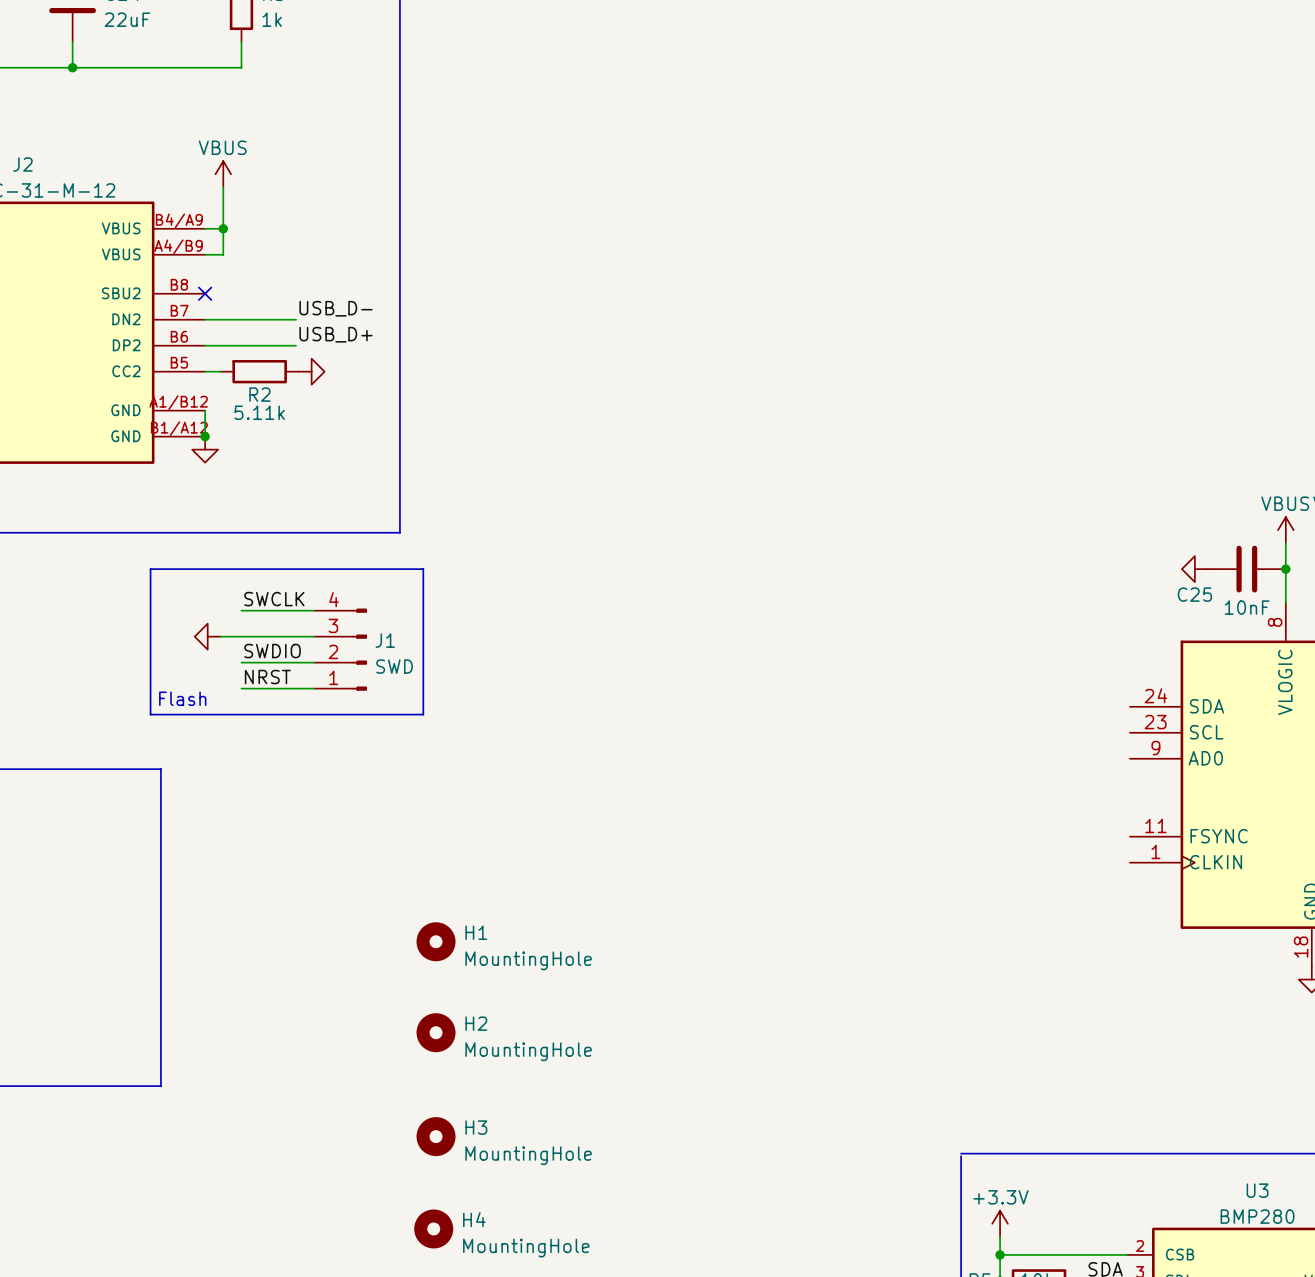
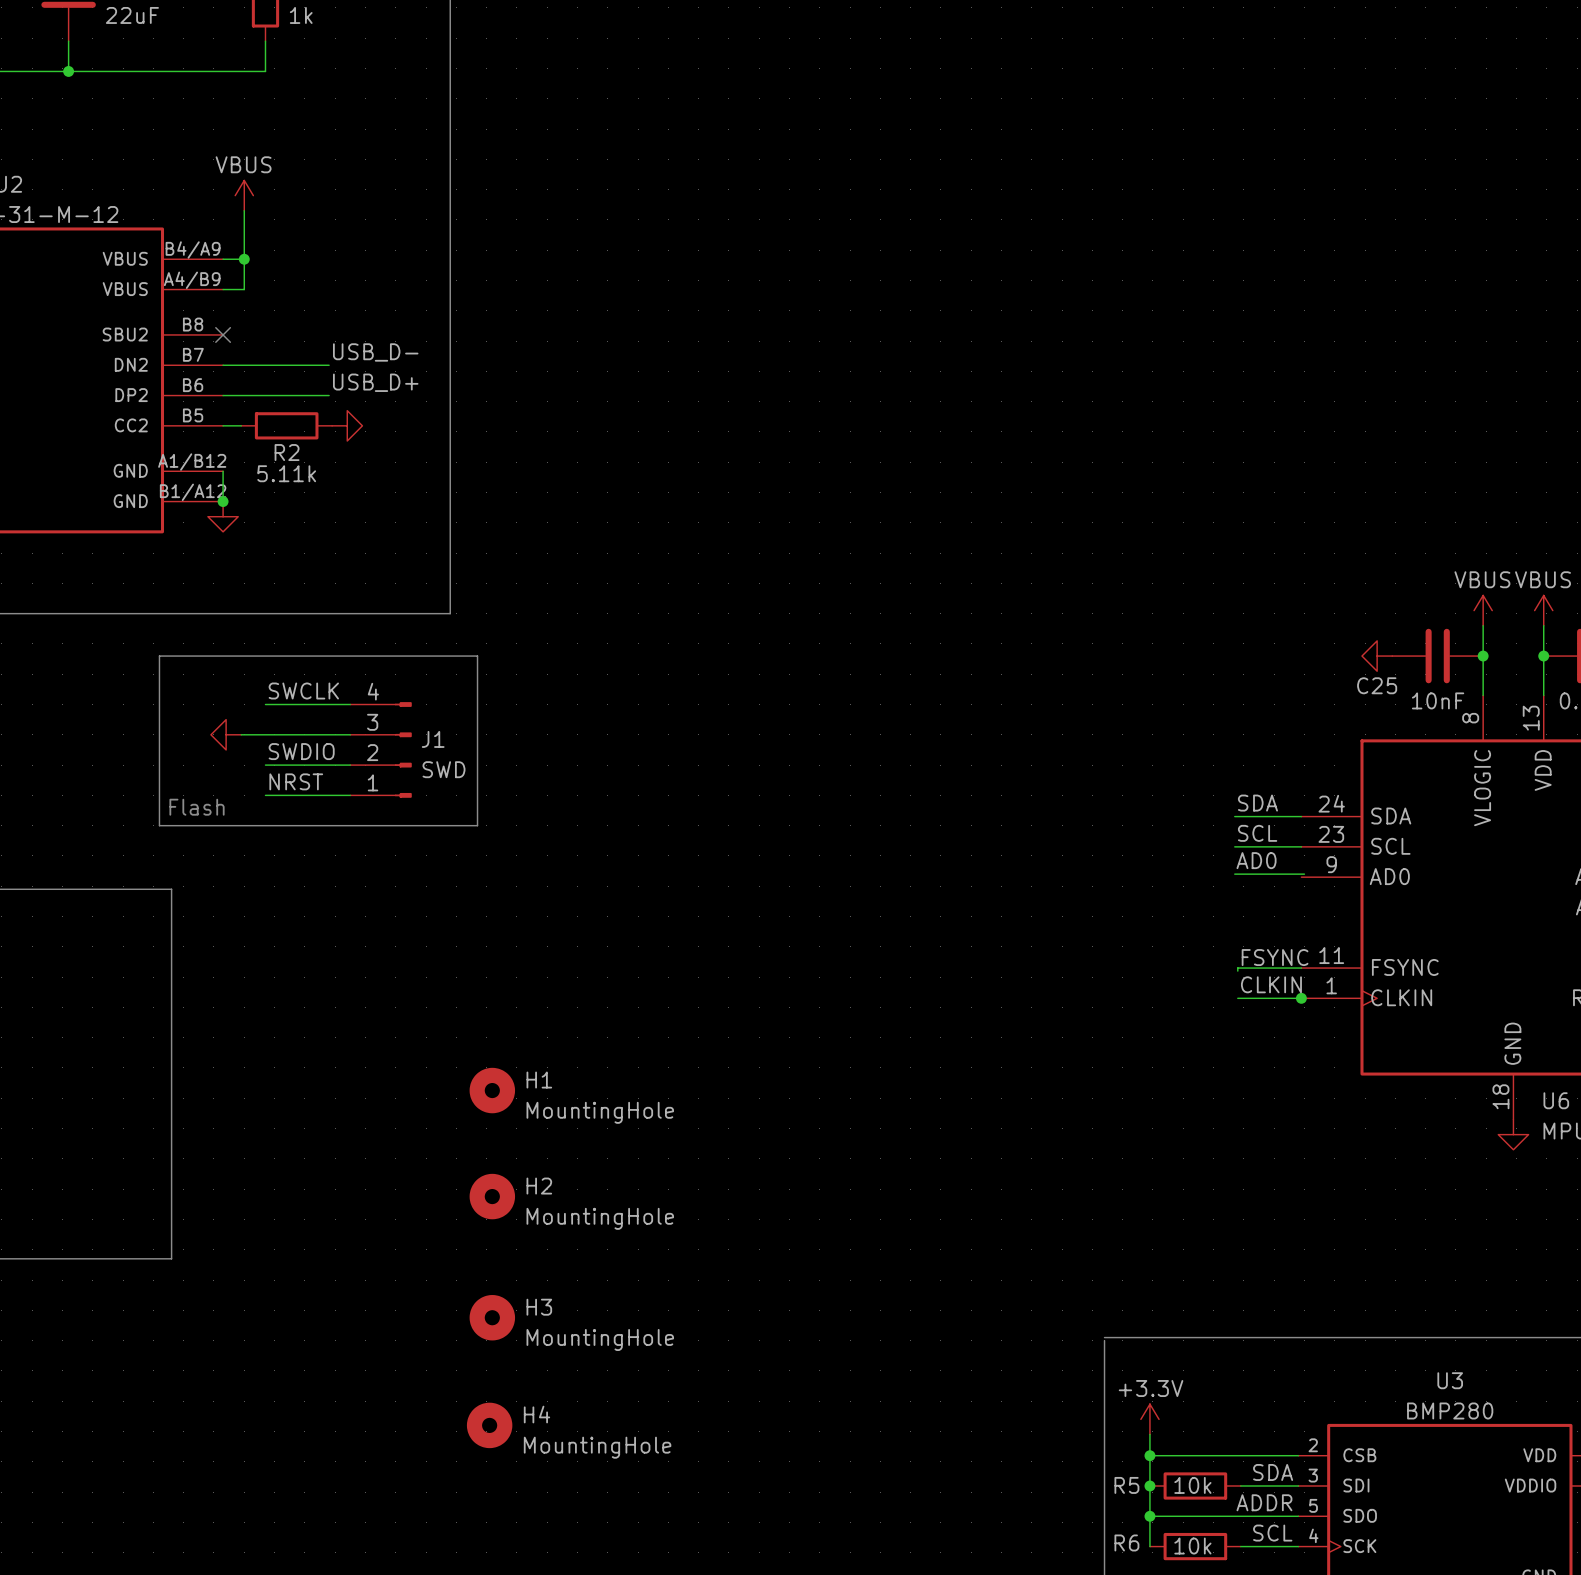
label: none -> SDA (1257, 803)
wire: none -> (1234, 816) (1301, 816)
label: none -> SCL (1257, 833)
wire: none -> (1234, 846) (1301, 846)
label: none -> AD0 (1256, 860)
wire: none -> (1234, 874) (1304, 874)
label: none -> FSYNC (1275, 957)
wire: none -> (1301, 968) (1237, 968) (1237, 971)
label: none -> CLKIN (1271, 984)
wire: none -> (1237, 998) (1304, 998)
junction: none -> (1301, 998)

